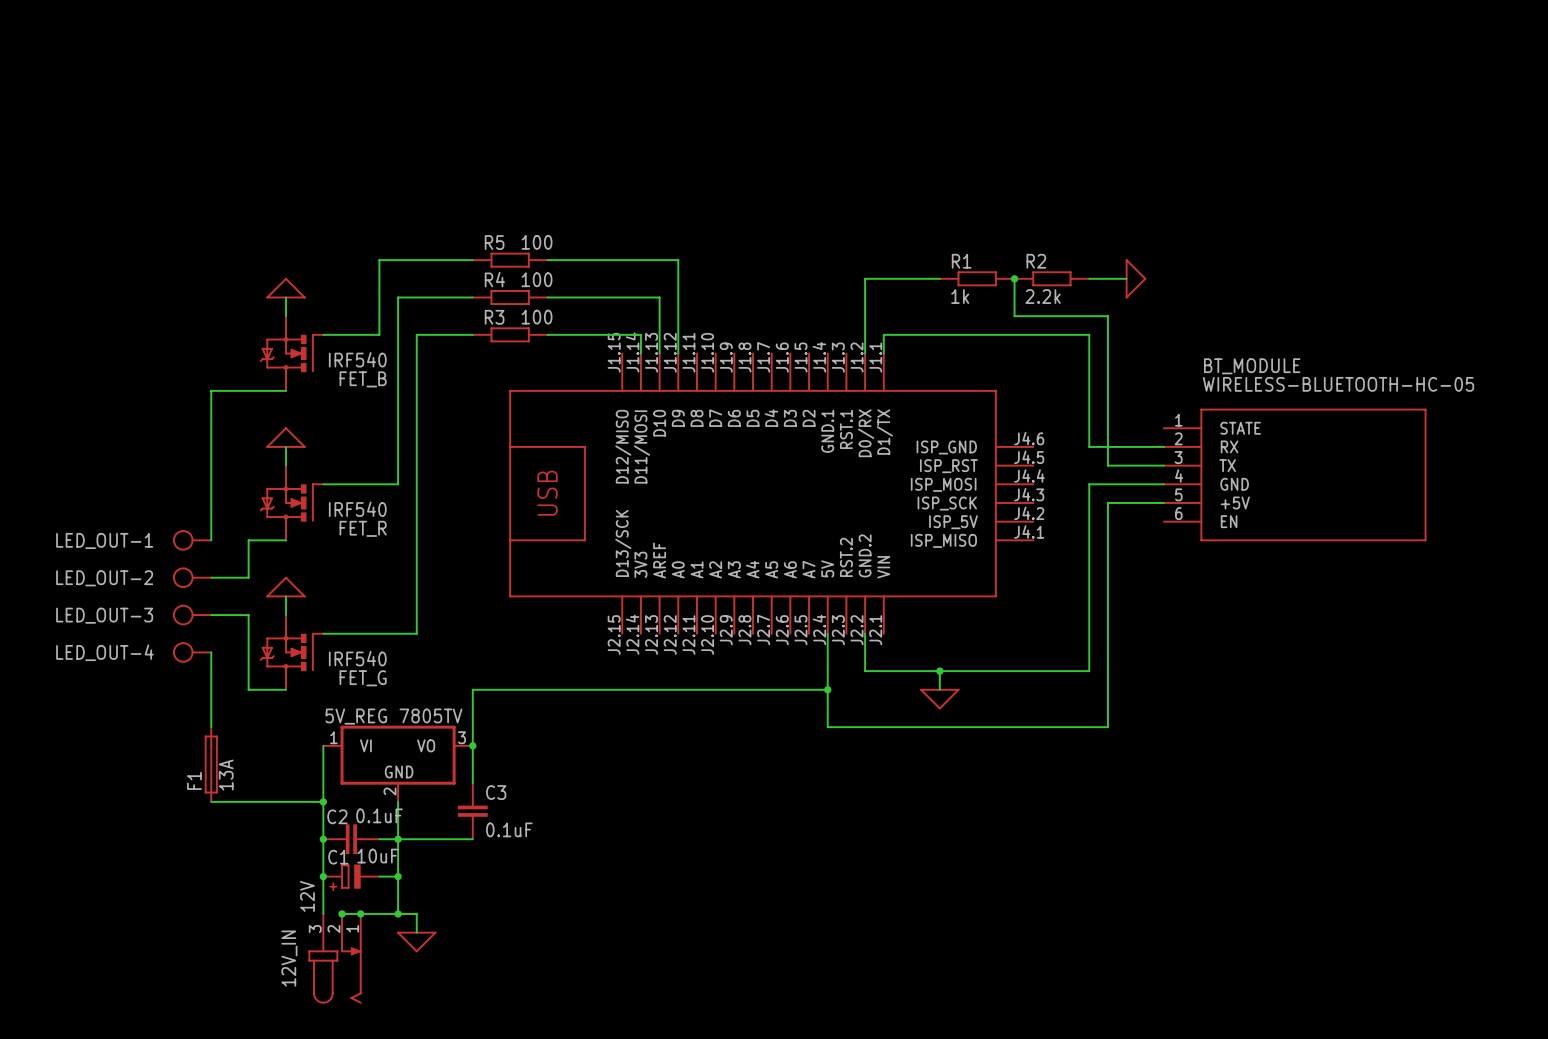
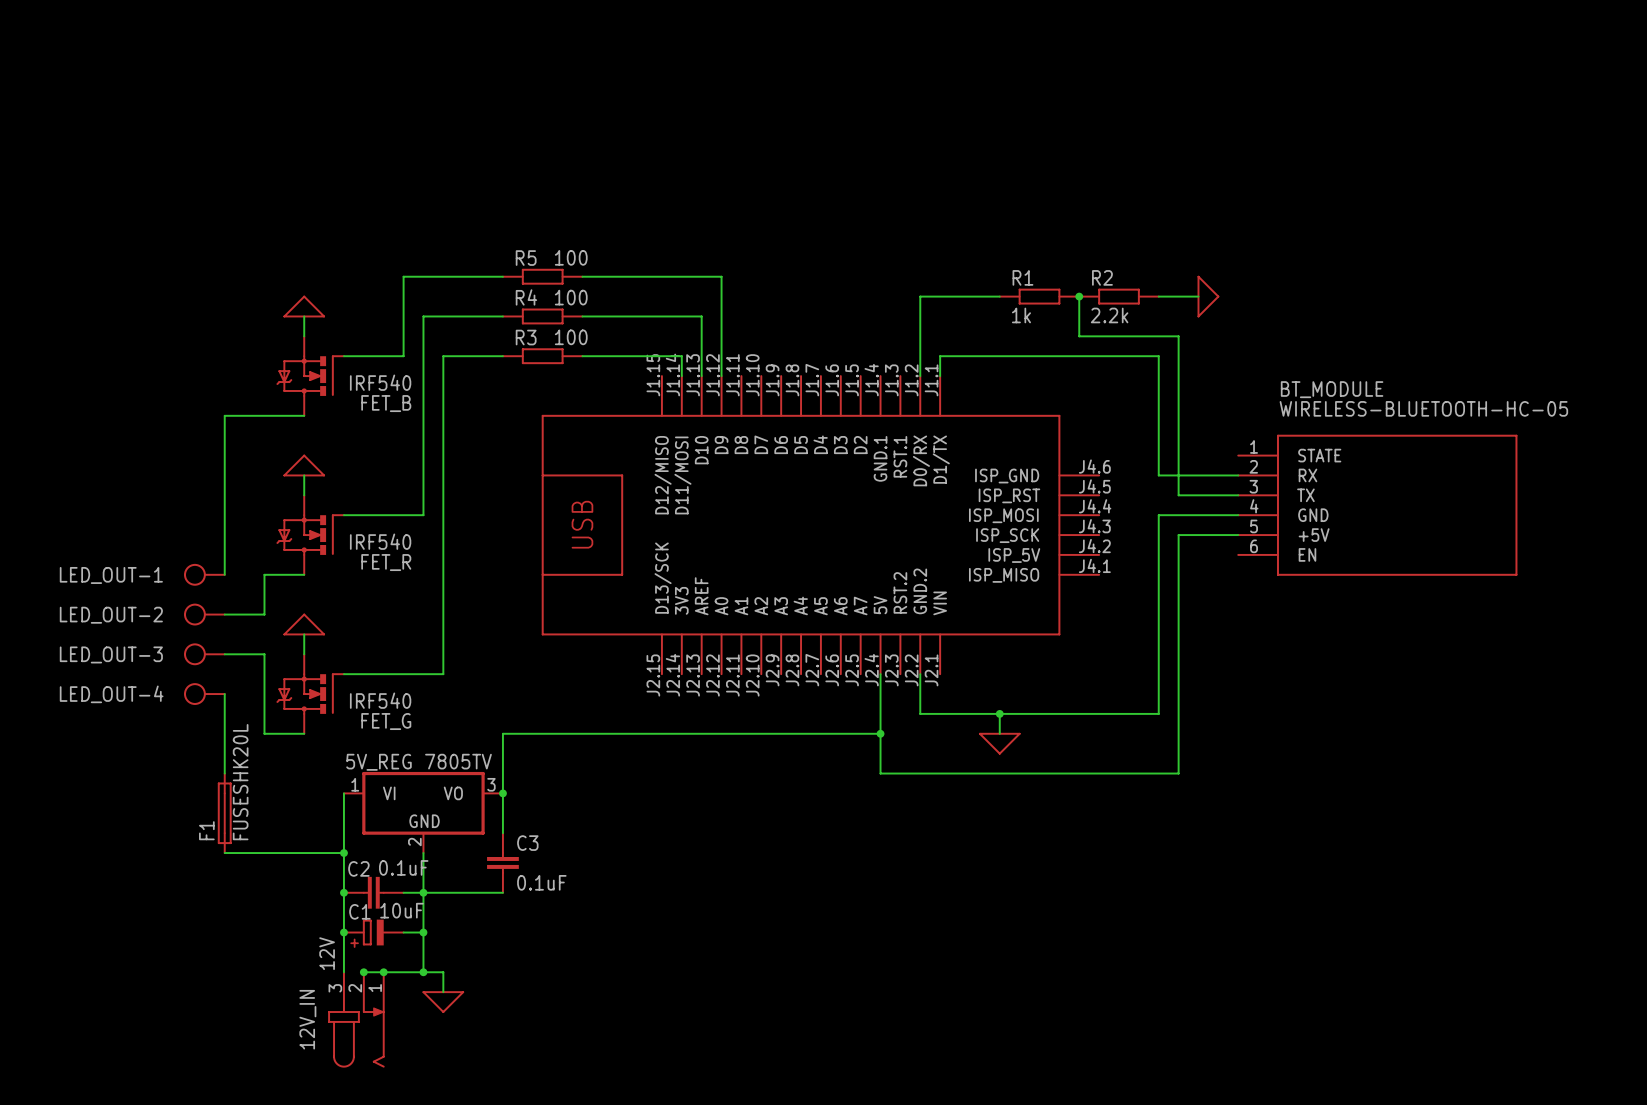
F1 value: 13A (226, 775) -> FUSESHK20L (240, 782)

